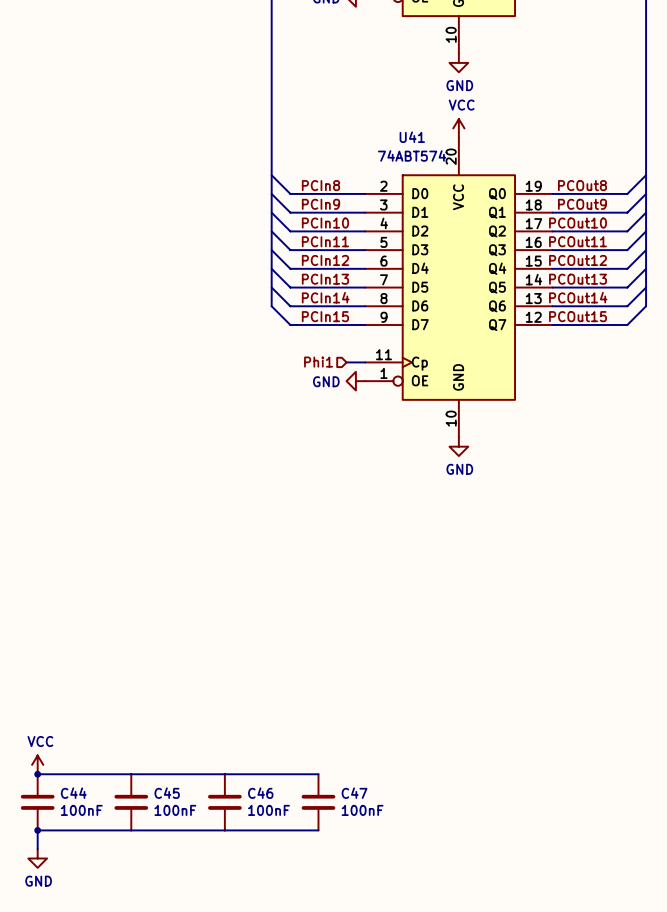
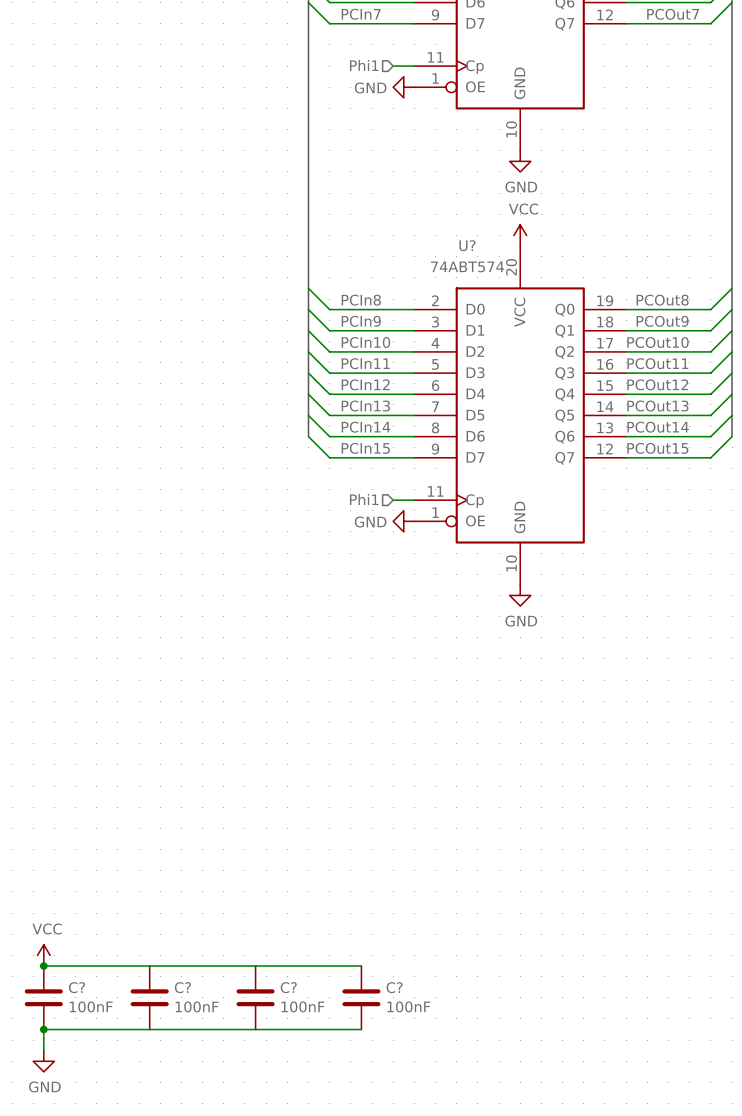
U41 name: U41 (412, 137) -> U? (467, 245)
C44 name: C44 (73, 793) -> C? (76, 987)
C45 name: C45 (167, 793) -> C? (182, 987)
C46 name: C46 (260, 793) -> C? (288, 987)
C47 name: C47 (354, 793) -> C? (394, 987)

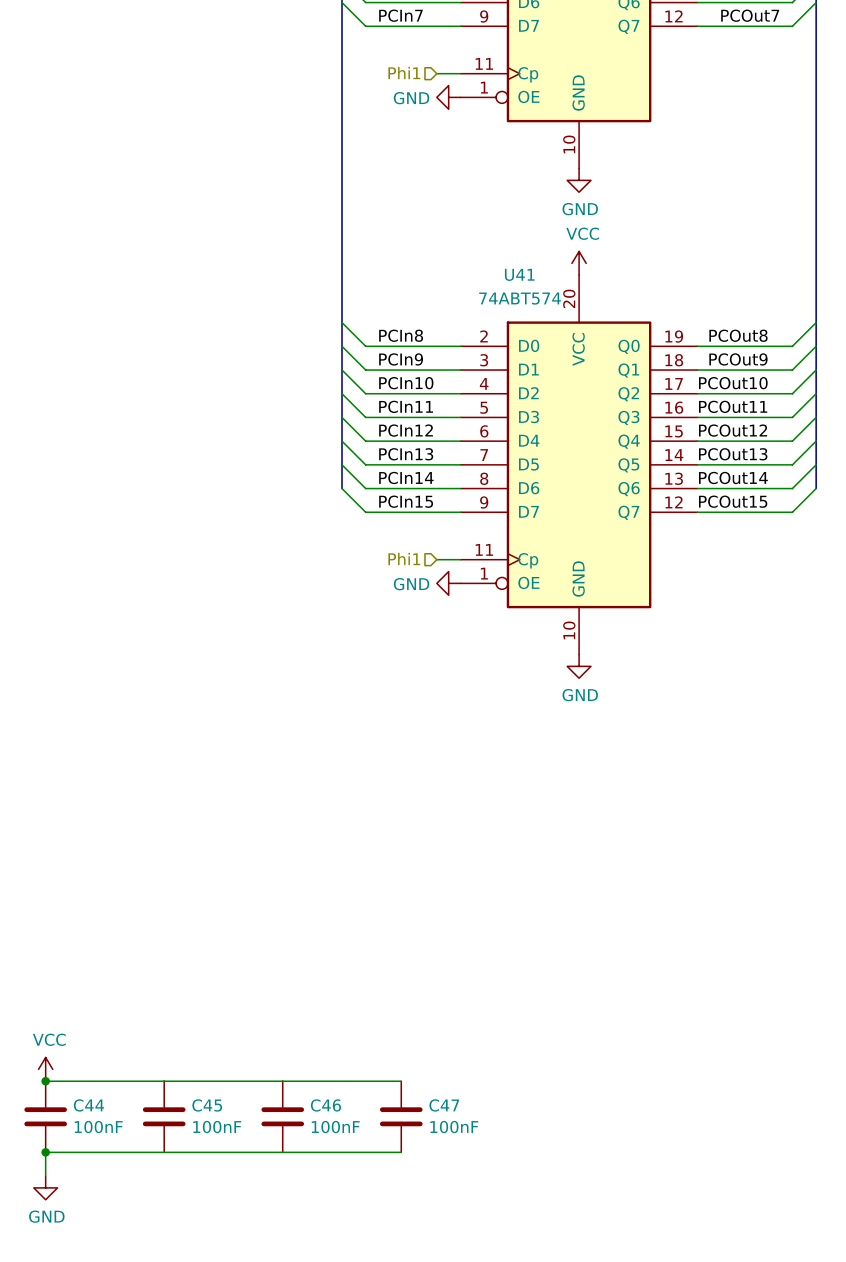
U? name: U? (467, 245) -> U41 (519, 274)
C? name: C? (76, 987) -> C44 (88, 1105)
C? name: C? (182, 987) -> C45 (207, 1105)
C? name: C? (288, 987) -> C46 (325, 1105)
C? name: C? (394, 987) -> C47 (444, 1105)

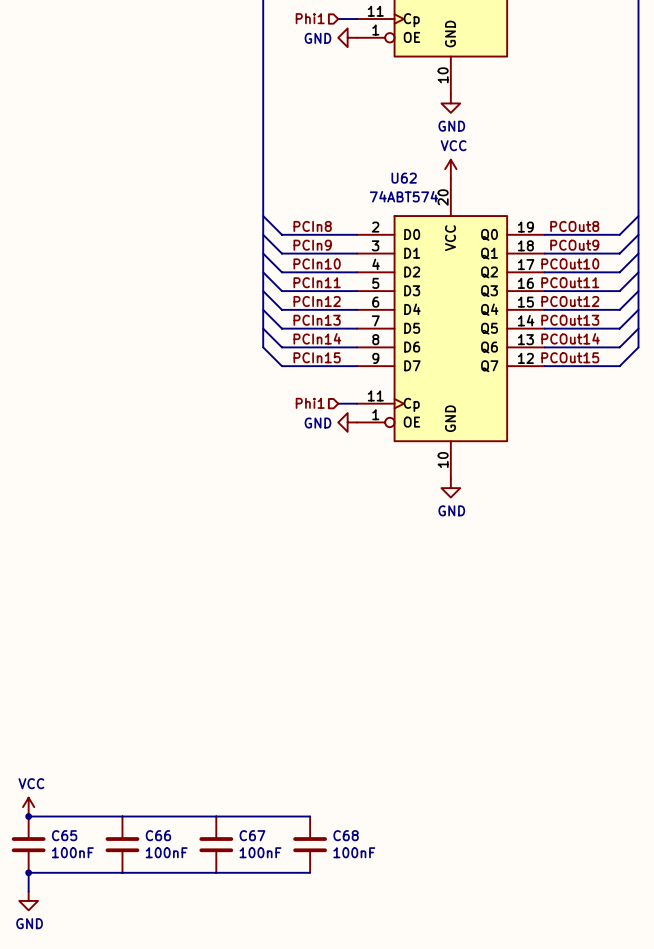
U41 name: U41 (519, 274) -> U62 (404, 178)
C44 name: C44 (88, 1105) -> C65 (64, 835)
C45 name: C45 (207, 1105) -> C66 (158, 835)
C46 name: C46 (325, 1105) -> C67 (252, 835)
C47 name: C47 (444, 1105) -> C68 (346, 835)

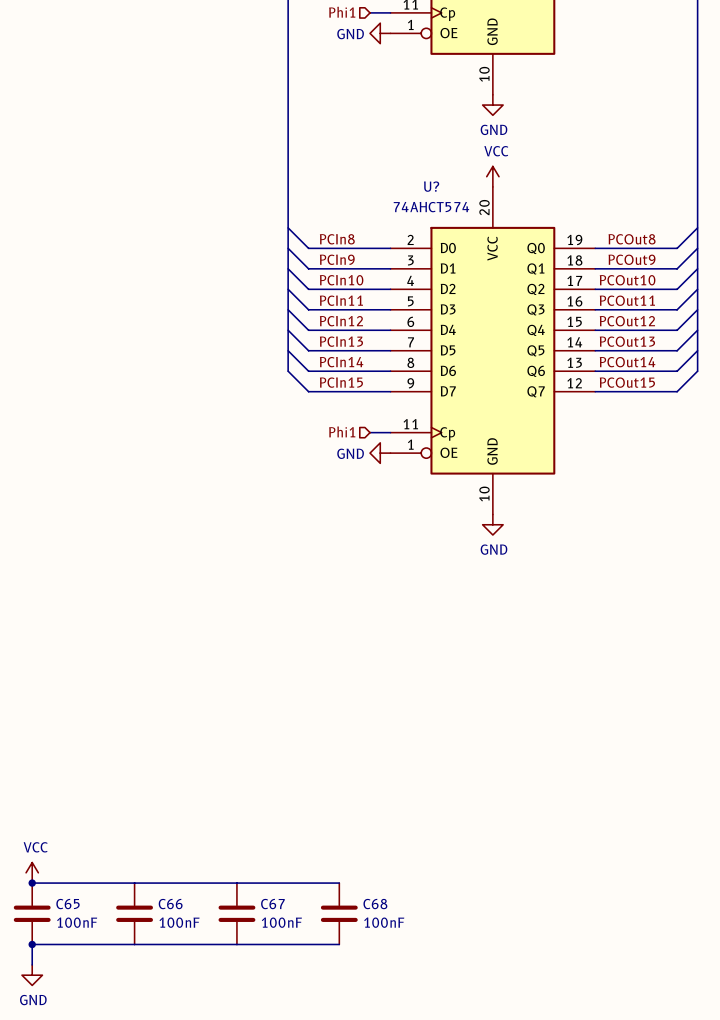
U62 name: U62 (404, 178) -> U? (431, 186)
U62 value: 74ABT574 (403, 196) -> 74AHCT574 (431, 207)

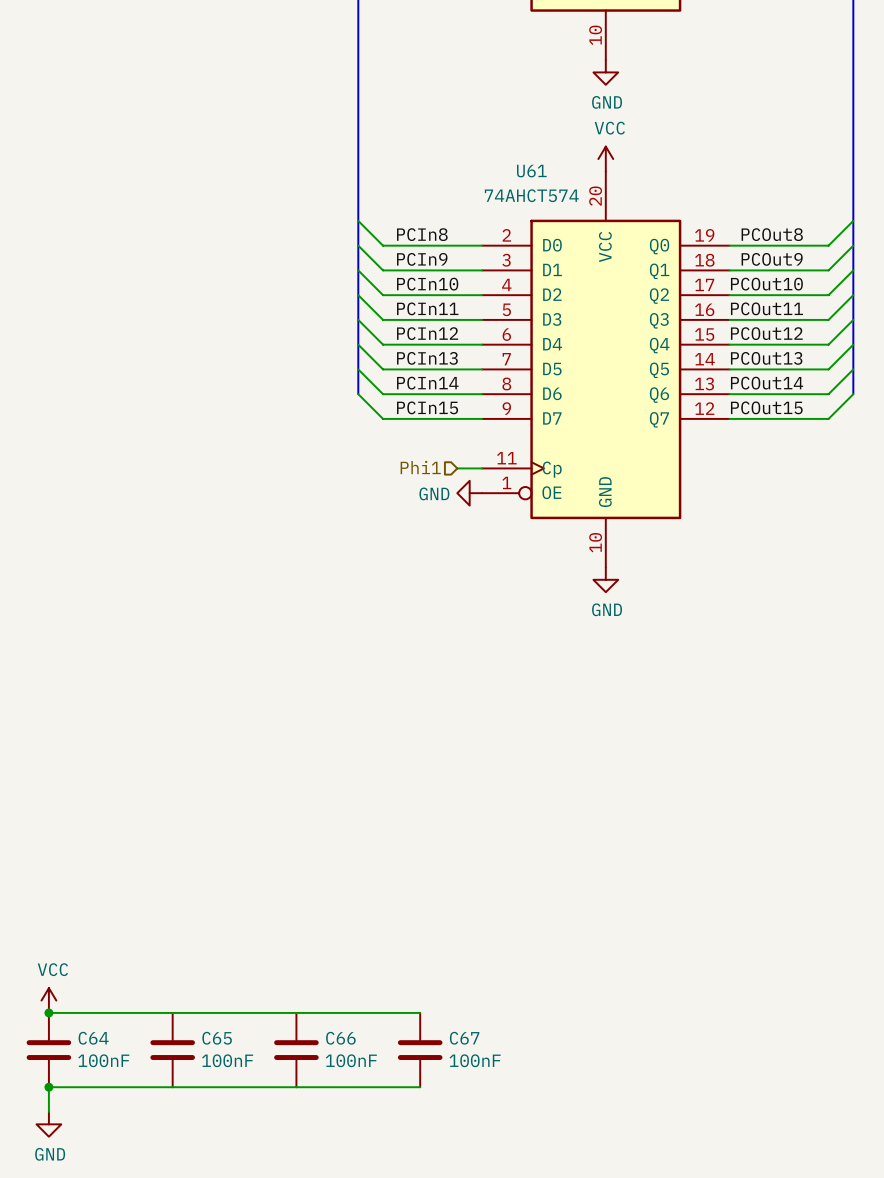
U? name: U? (431, 186) -> U61 (531, 171)
C65 name: C65 (68, 904) -> C64 (93, 1038)
C66 name: C66 (170, 904) -> C65 (217, 1038)
C67 name: C67 (272, 904) -> C66 (340, 1038)
C68 name: C68 (375, 904) -> C67 (464, 1038)

